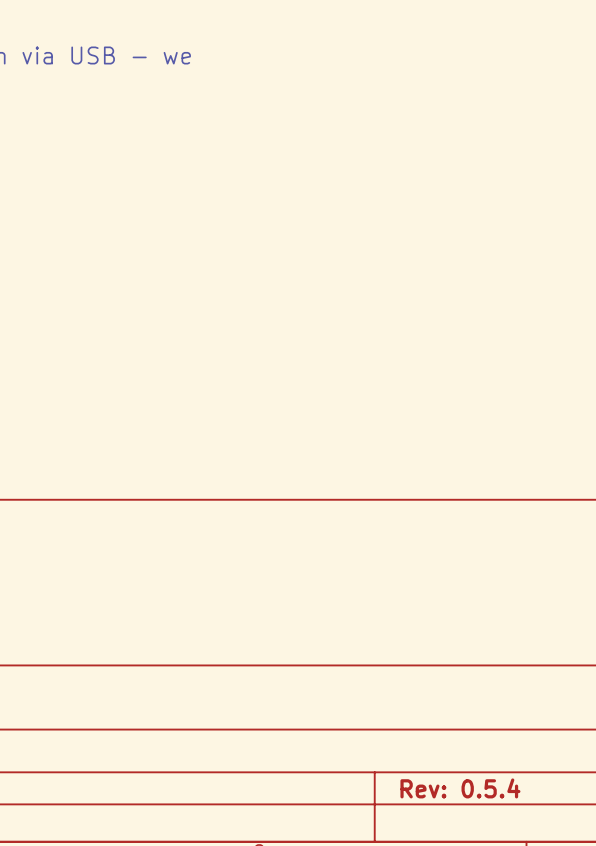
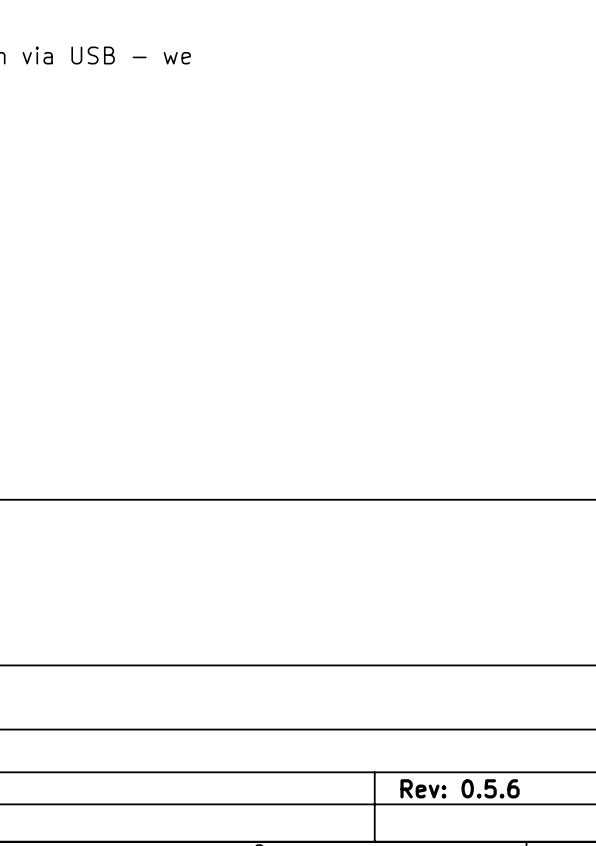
title block: Rev: 0.5.4 (460, 788) -> Rev: 0.5.6 (460, 788)

